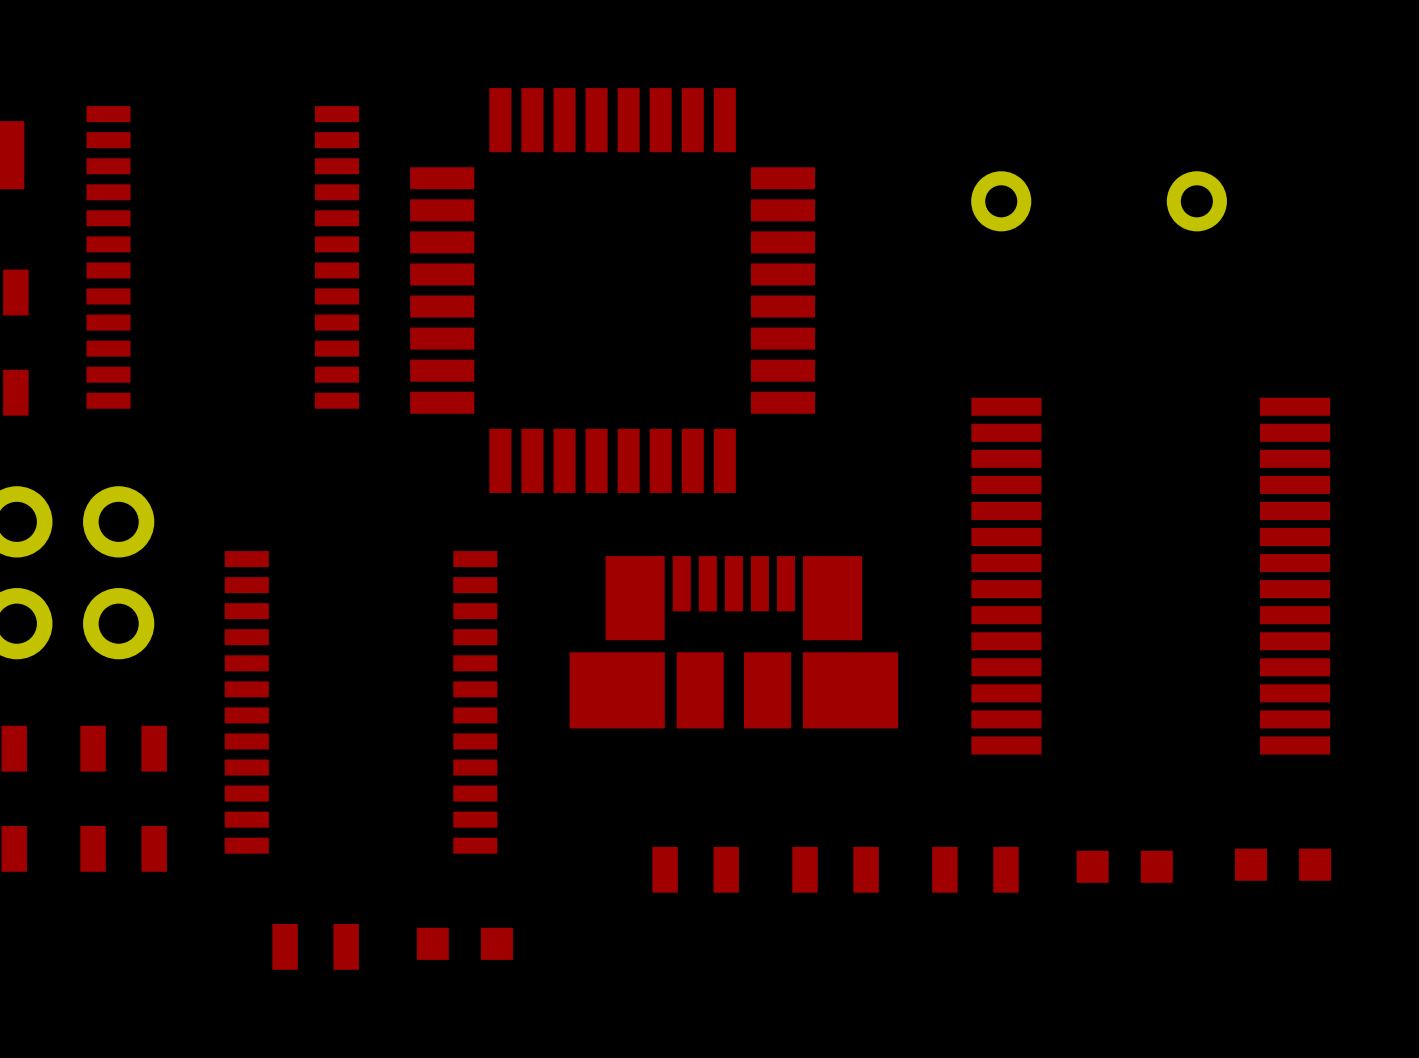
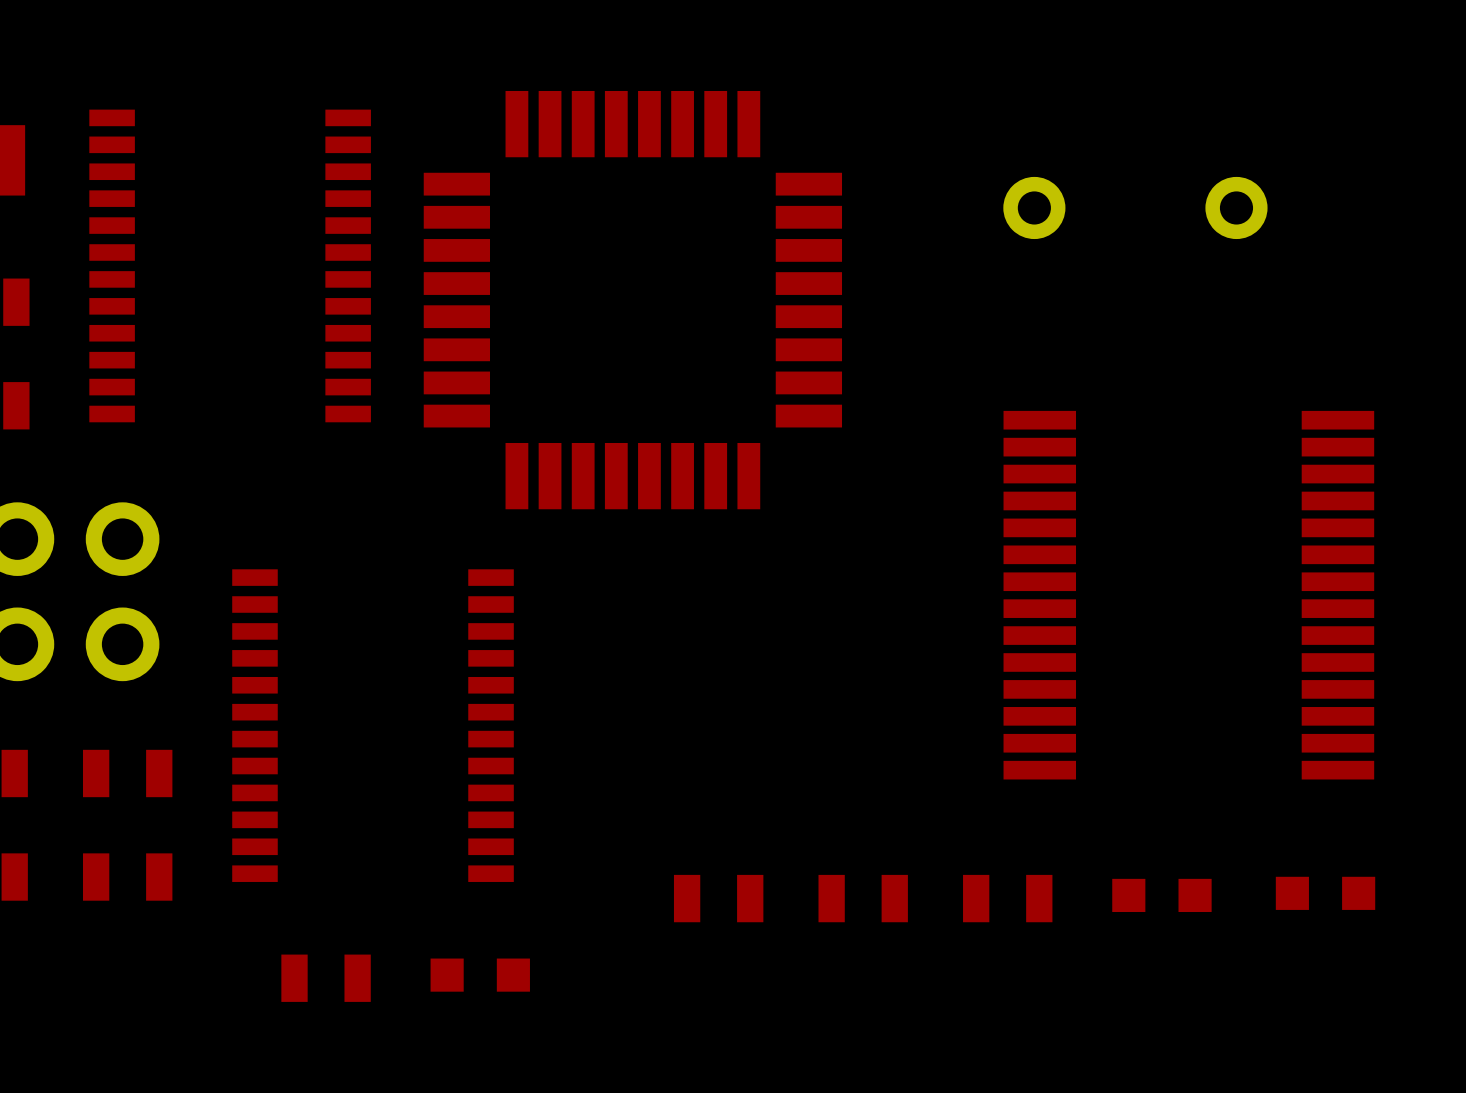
part: (733, 642) -> none

